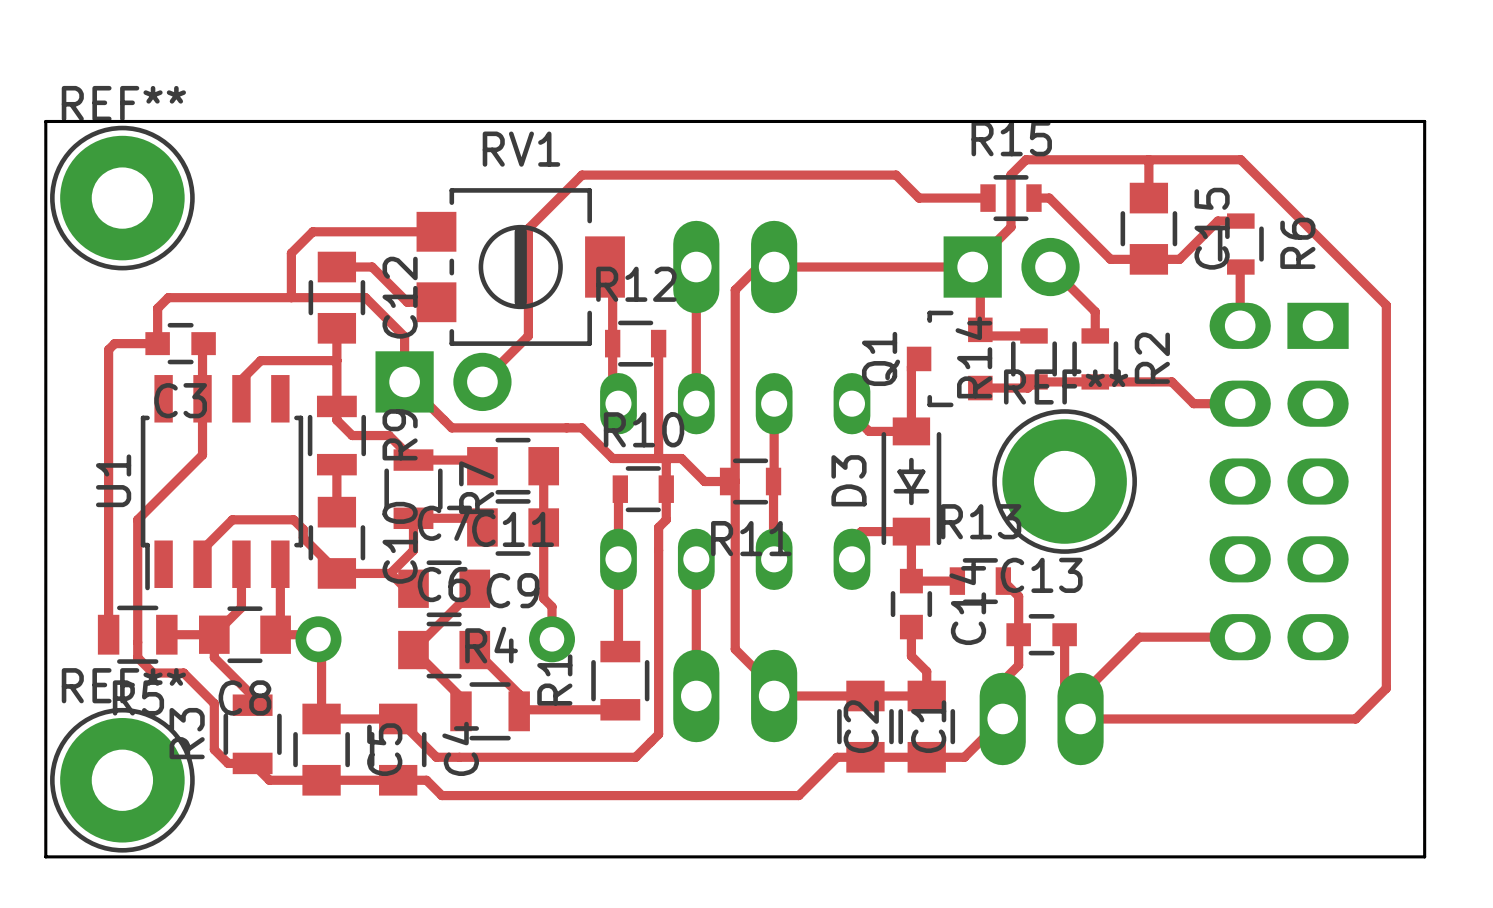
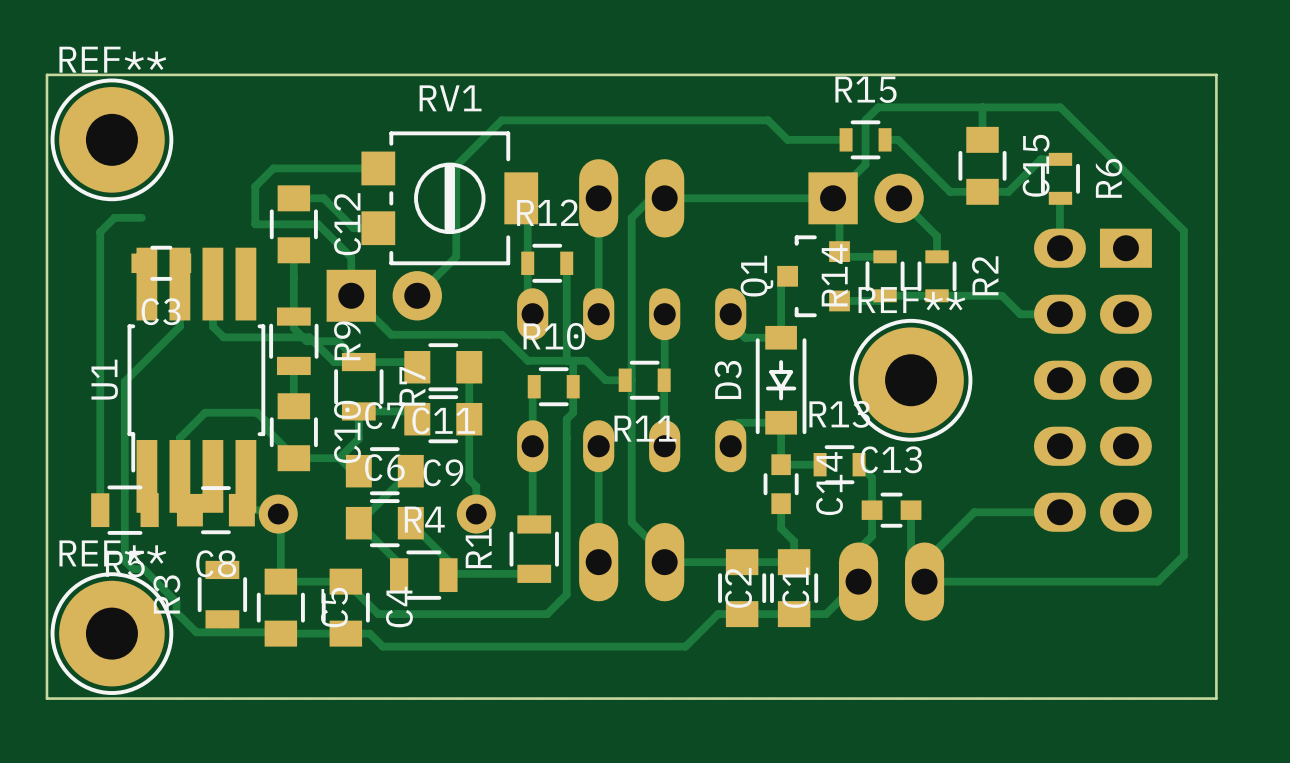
track: (291, 297) (168, 297) (157, 308) (157, 343) (114, 343) (108, 349) -> (141, 217) (114, 217) (100, 232) (100, 268)
track: (336, 360) (260, 360) (241, 379) -> none
U1 footprint: [140, 375, 304, 591] -> [127, 247, 266, 513]
track: none -> (212, 310) (212, 326) (223, 337) (309, 337) (334, 362) (351, 362)
track: (202, 418) (202, 455) (137, 519) (137, 657) (153, 673) (183, 673) (214, 703) (214, 749) (228, 763) (252, 763) (269, 780) (321, 780) -> (179, 326) (124, 381) (124, 560) (132, 569) (143, 569) (176, 601) (176, 612) (196, 632) (279, 632)
track: (166, 634) (214, 634) (214, 657) (252, 696) (252, 705) -> none

